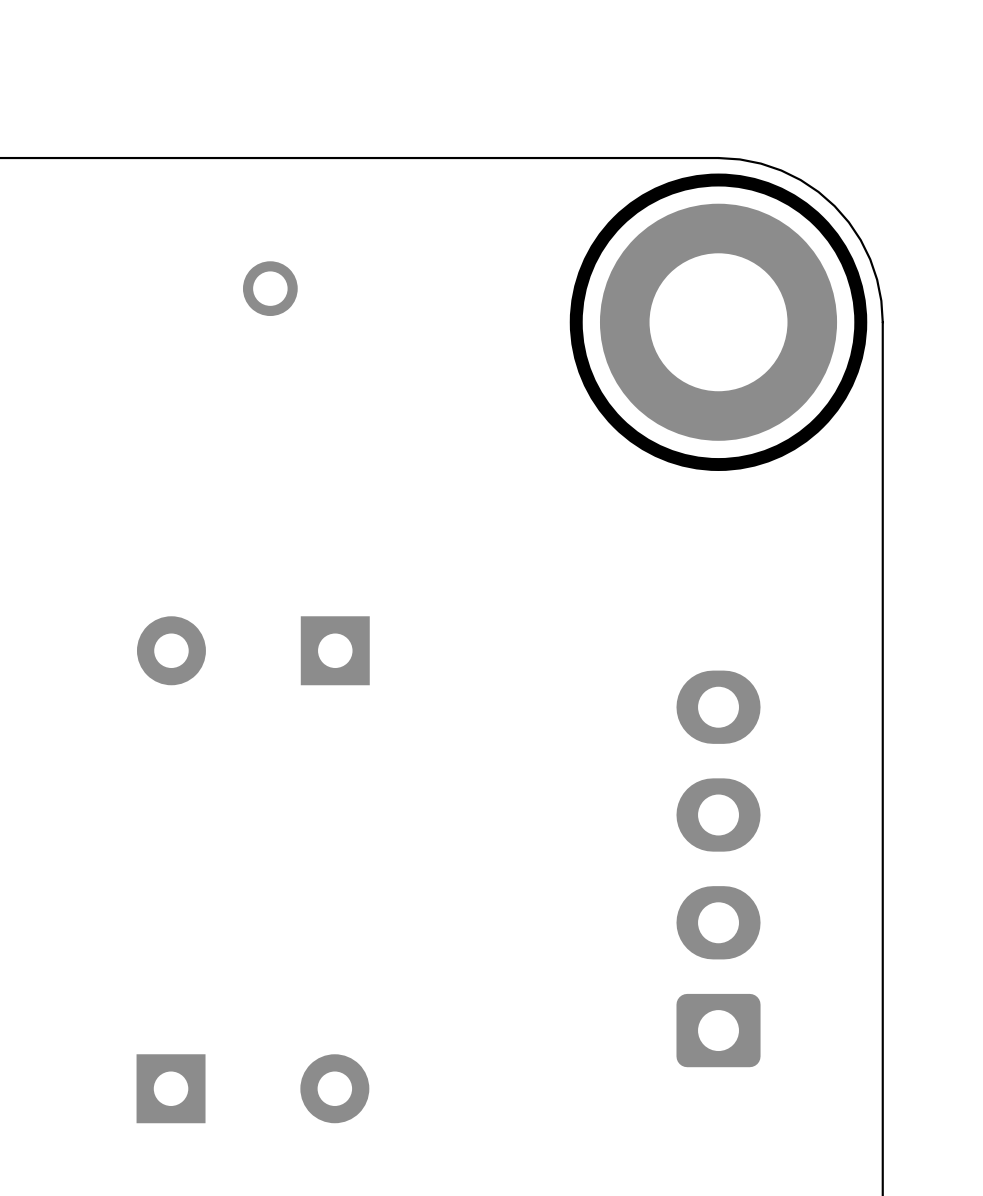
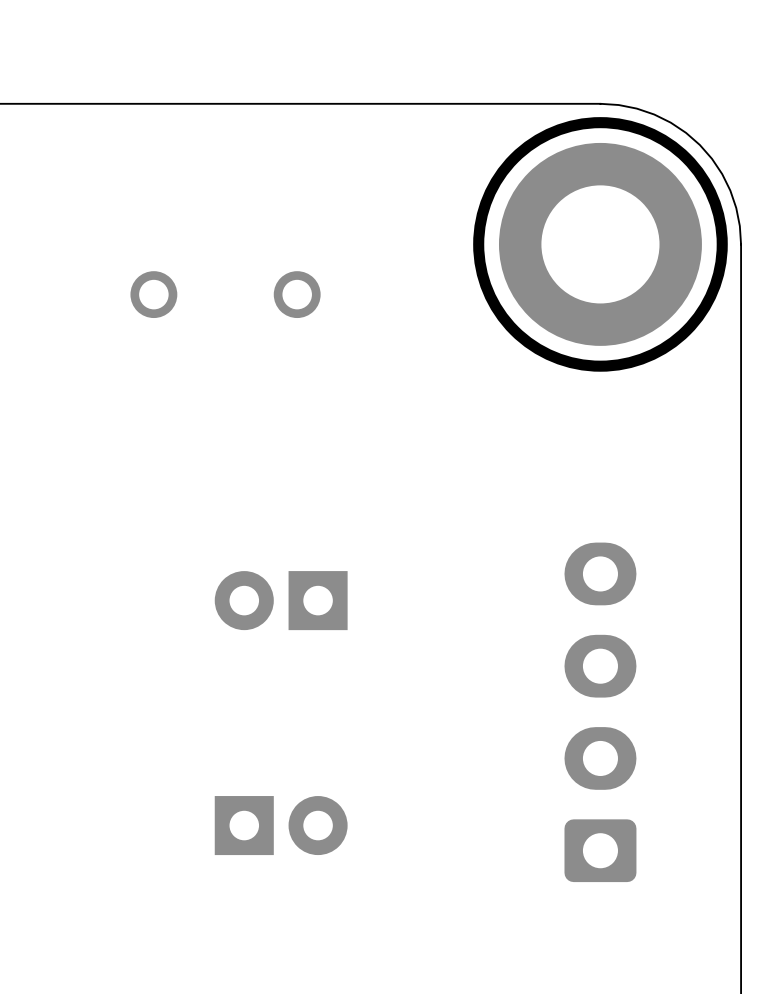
via: (270, 288) -> none
via: none -> (153, 294)
via: none -> (297, 294)
part: (253, 650) -> none
part: none -> (281, 600)
part: none -> (281, 825)
part: (252, 1088) -> none

